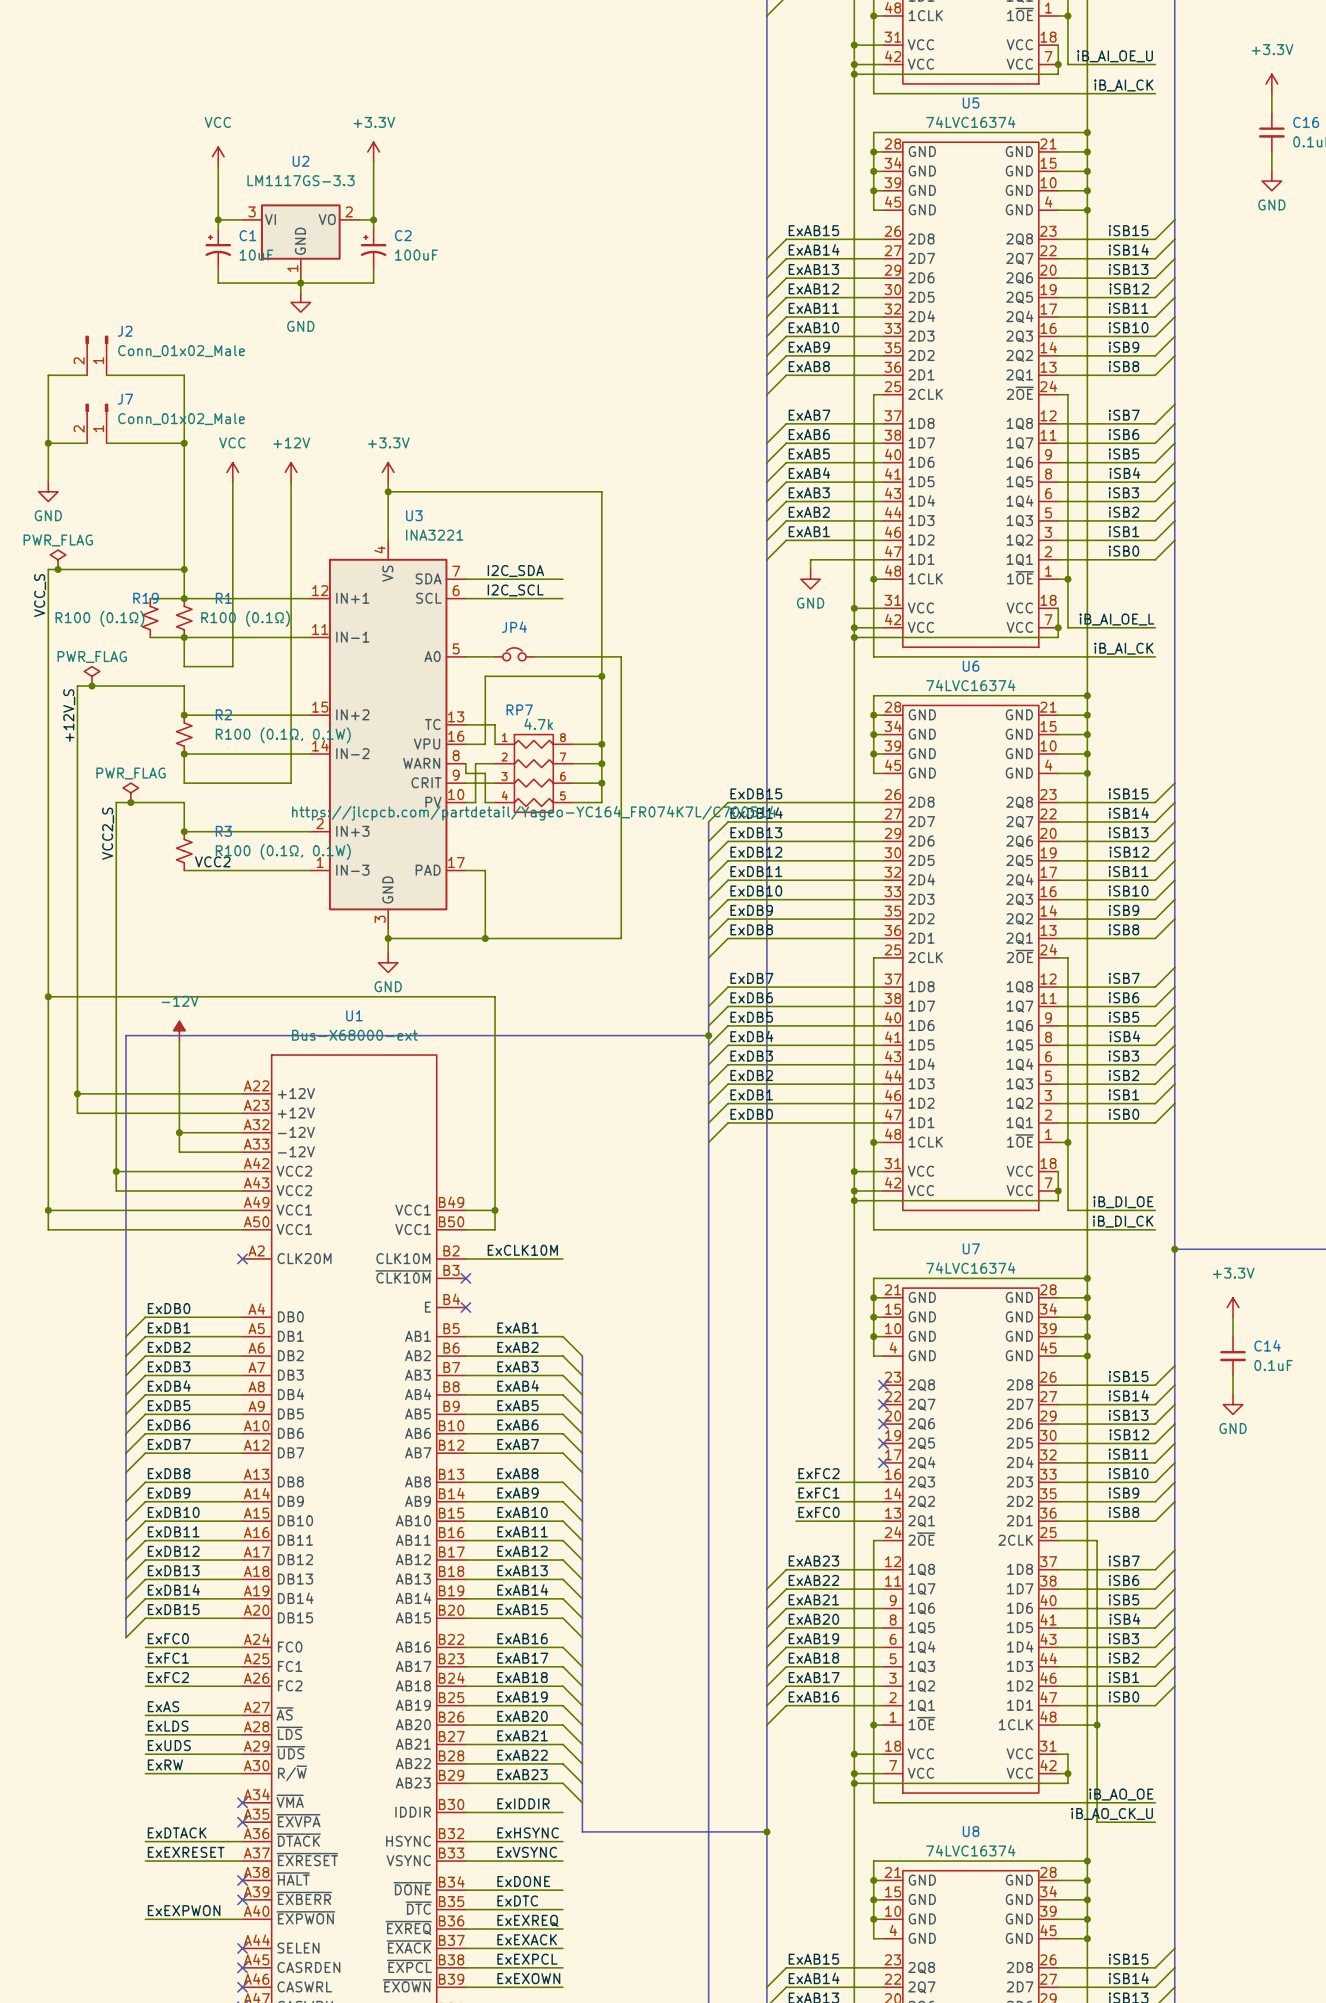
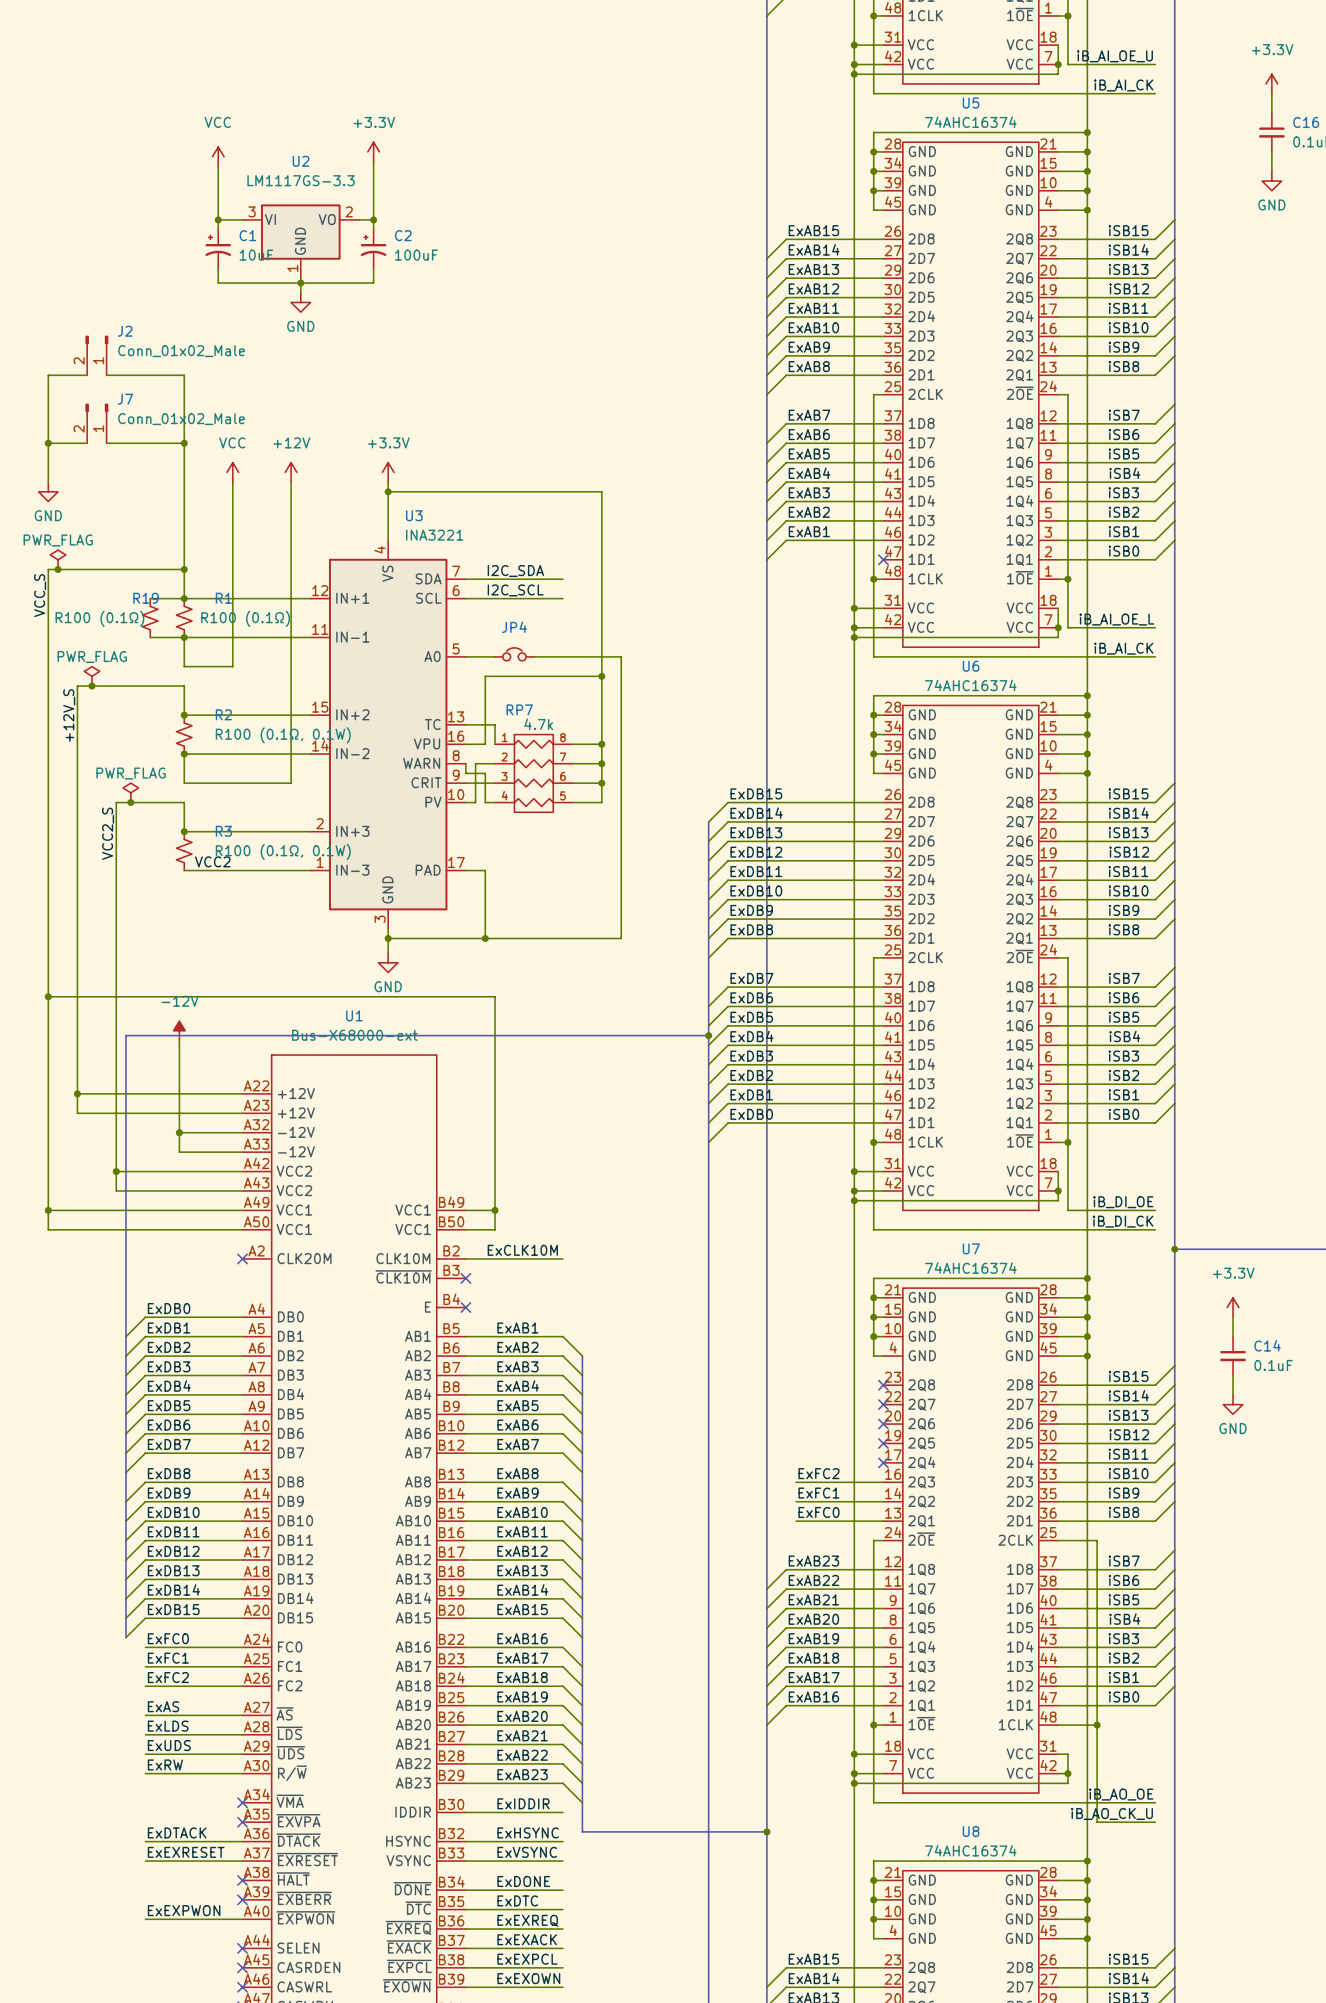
U5 value: 74LVC16374 (970, 122) -> 74AHC16374 (970, 122)
wire: (883, 559) (810, 559) (810, 569) -> none
no-connect mark: none -> (883, 559)
power symbol: GND (810, 579) -> none
U6 value: 74LVC16374 (970, 685) -> 74AHC16374 (970, 685)
RP7 text: https://jlcpcb.com/partdetail/Yageo-YC164_FR074K7L/C700514 (534, 813) -> none
U7 value: 74LVC16374 (970, 1268) -> 74AHC16374 (970, 1268)
U8 value: 74LVC16374 (970, 1850) -> 74AHC16374 (970, 1850)

